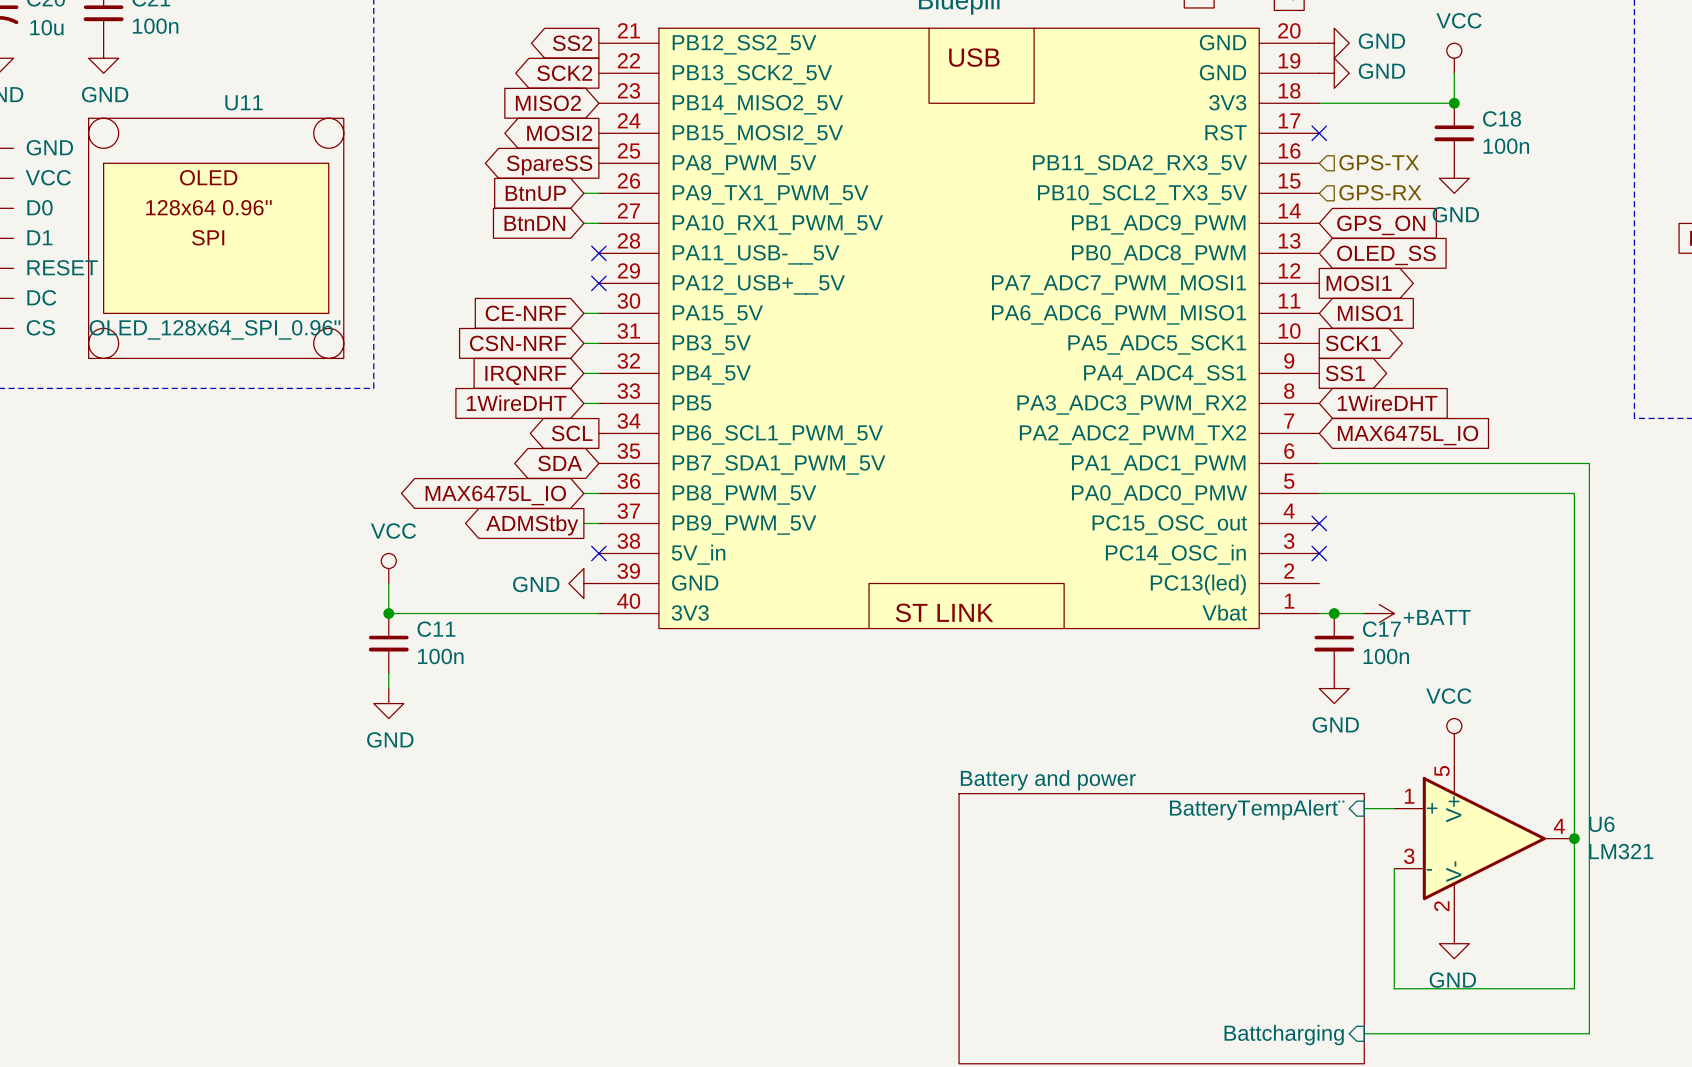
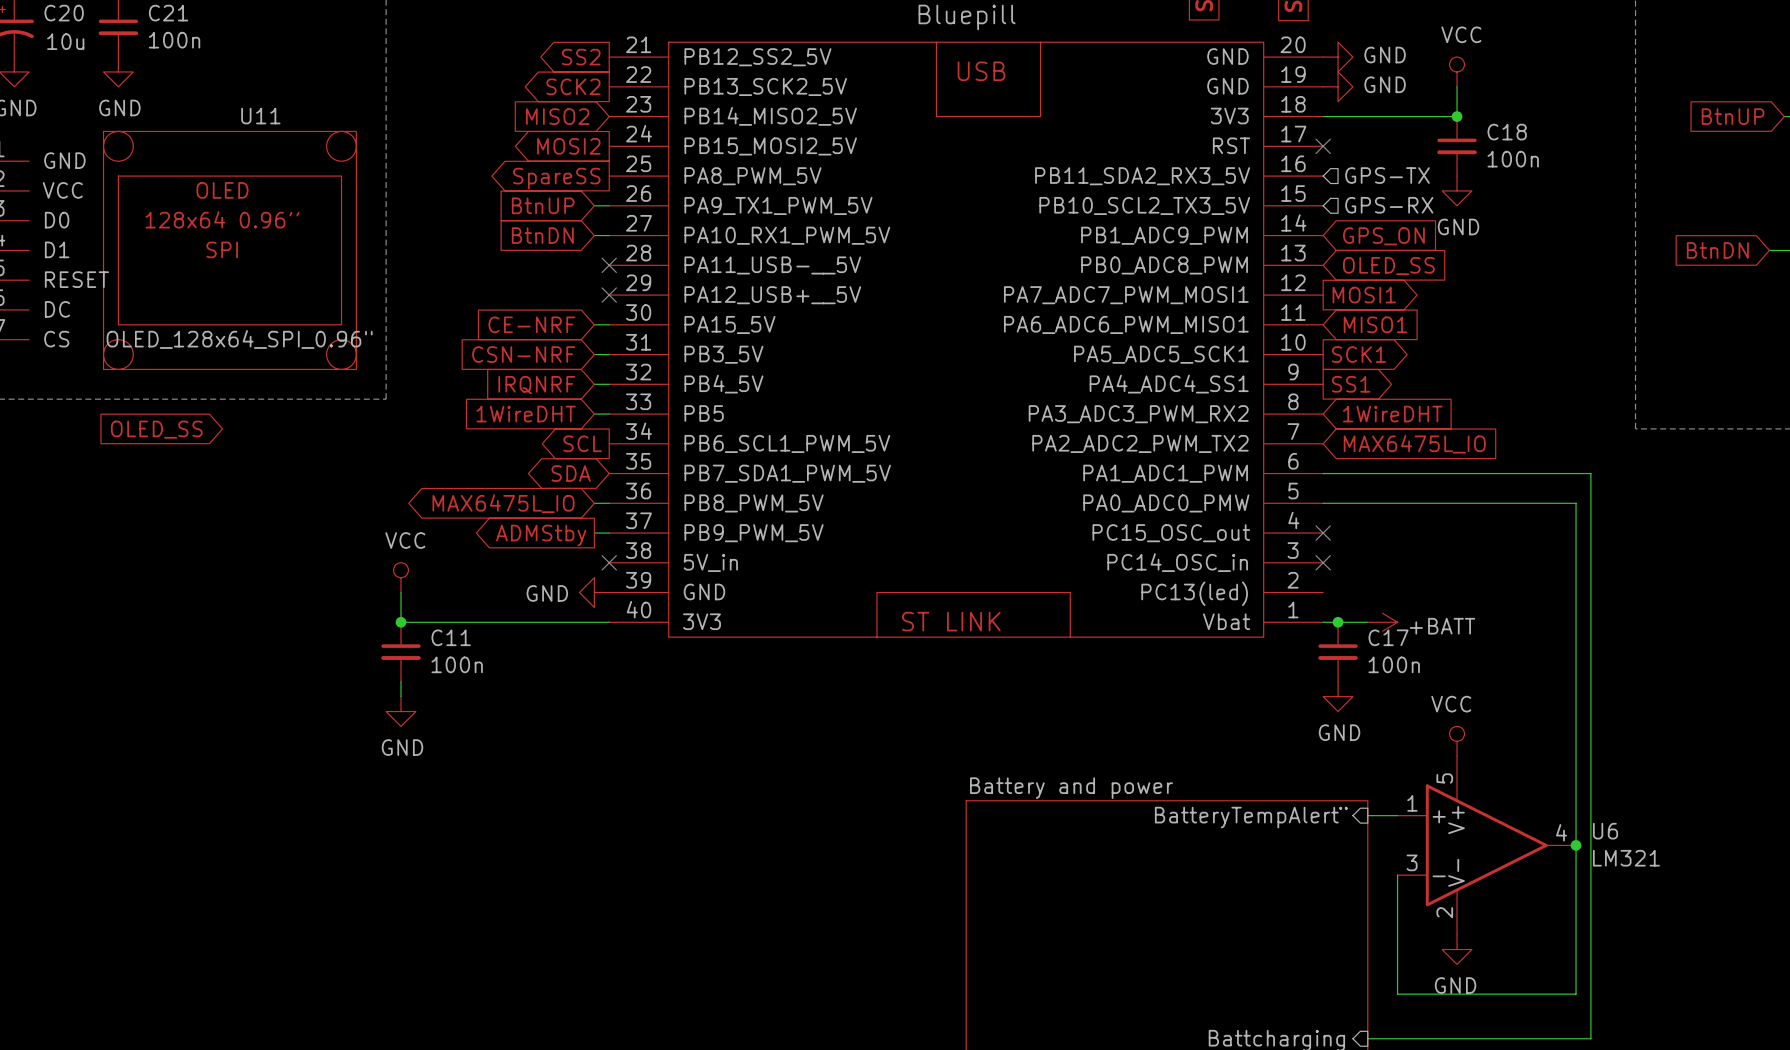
global label: none -> OLED_SS (156, 429)

